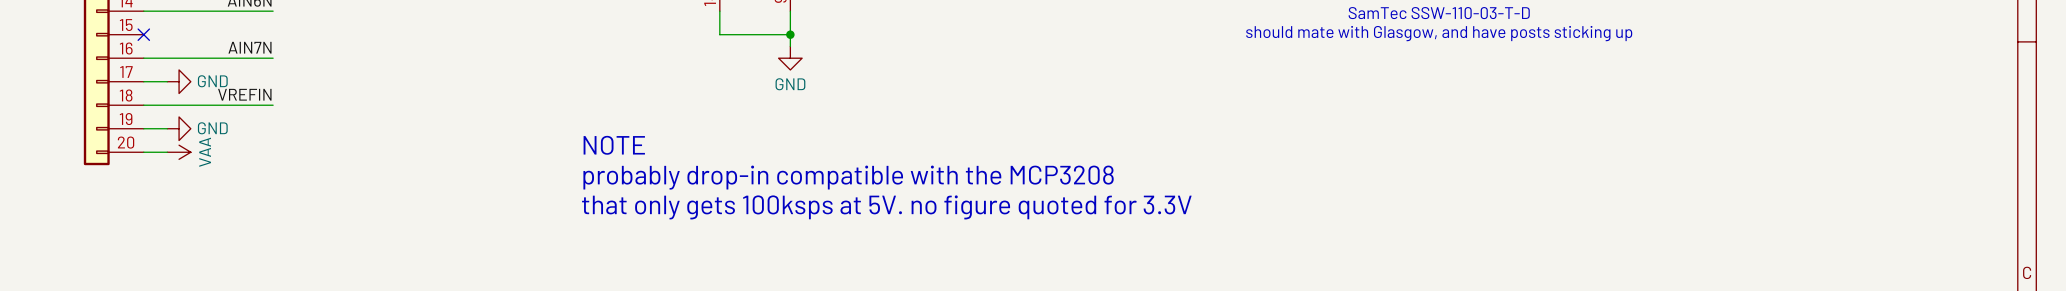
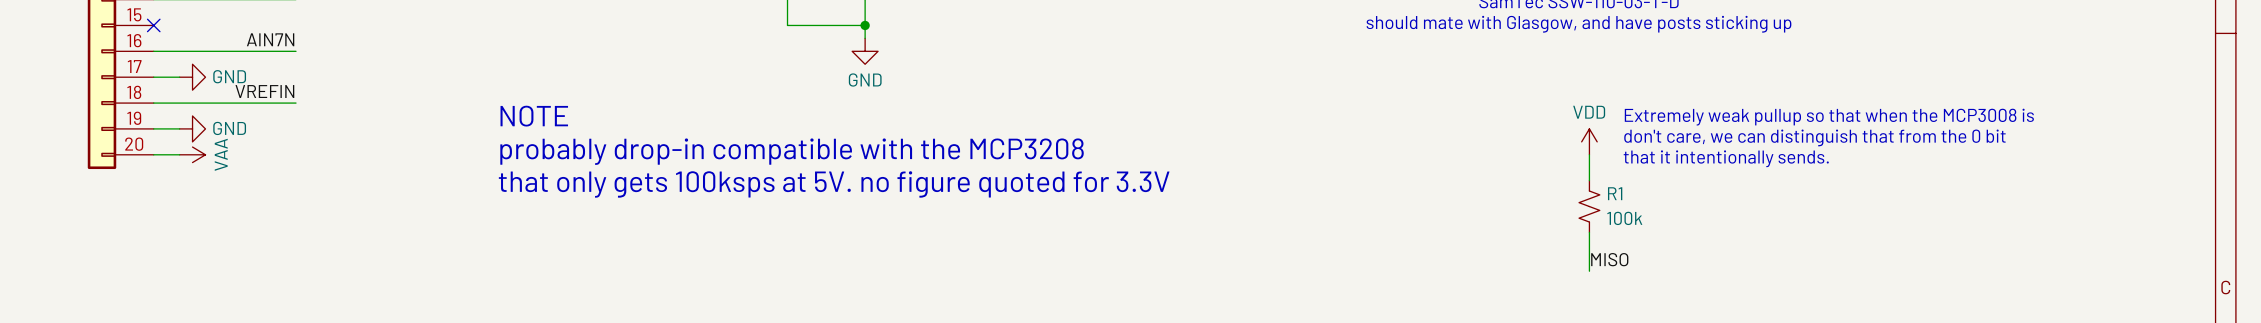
text: none -> Extremely weak pullup so that when the MCP3008 is (1829, 117)
text: none -> don't care, we can distinguish that from the 0 bit (1814, 137)
power symbol: none -> VDD (1589, 141)
text position: NOTE (614, 145) -> NOTE (534, 116)
wire: none -> (1589, 154) (1589, 180)
text: none -> that it intentionally sends. (1726, 158)
text position: probably drop-in compatible with the MCP3208 (848, 177) -> probably drop-in compatible with the MCP3208 (792, 151)
R1: none -> 100k (1589, 206)
text position: that only gets 100ksps at 5V. no figure quoted for 3.3V (886, 207) -> that only gets 100ksps at 5V. no figure quoted for 3.3V (834, 184)
wire: none -> (1589, 232) (1589, 271)
label: none -> MISO (1609, 259)

